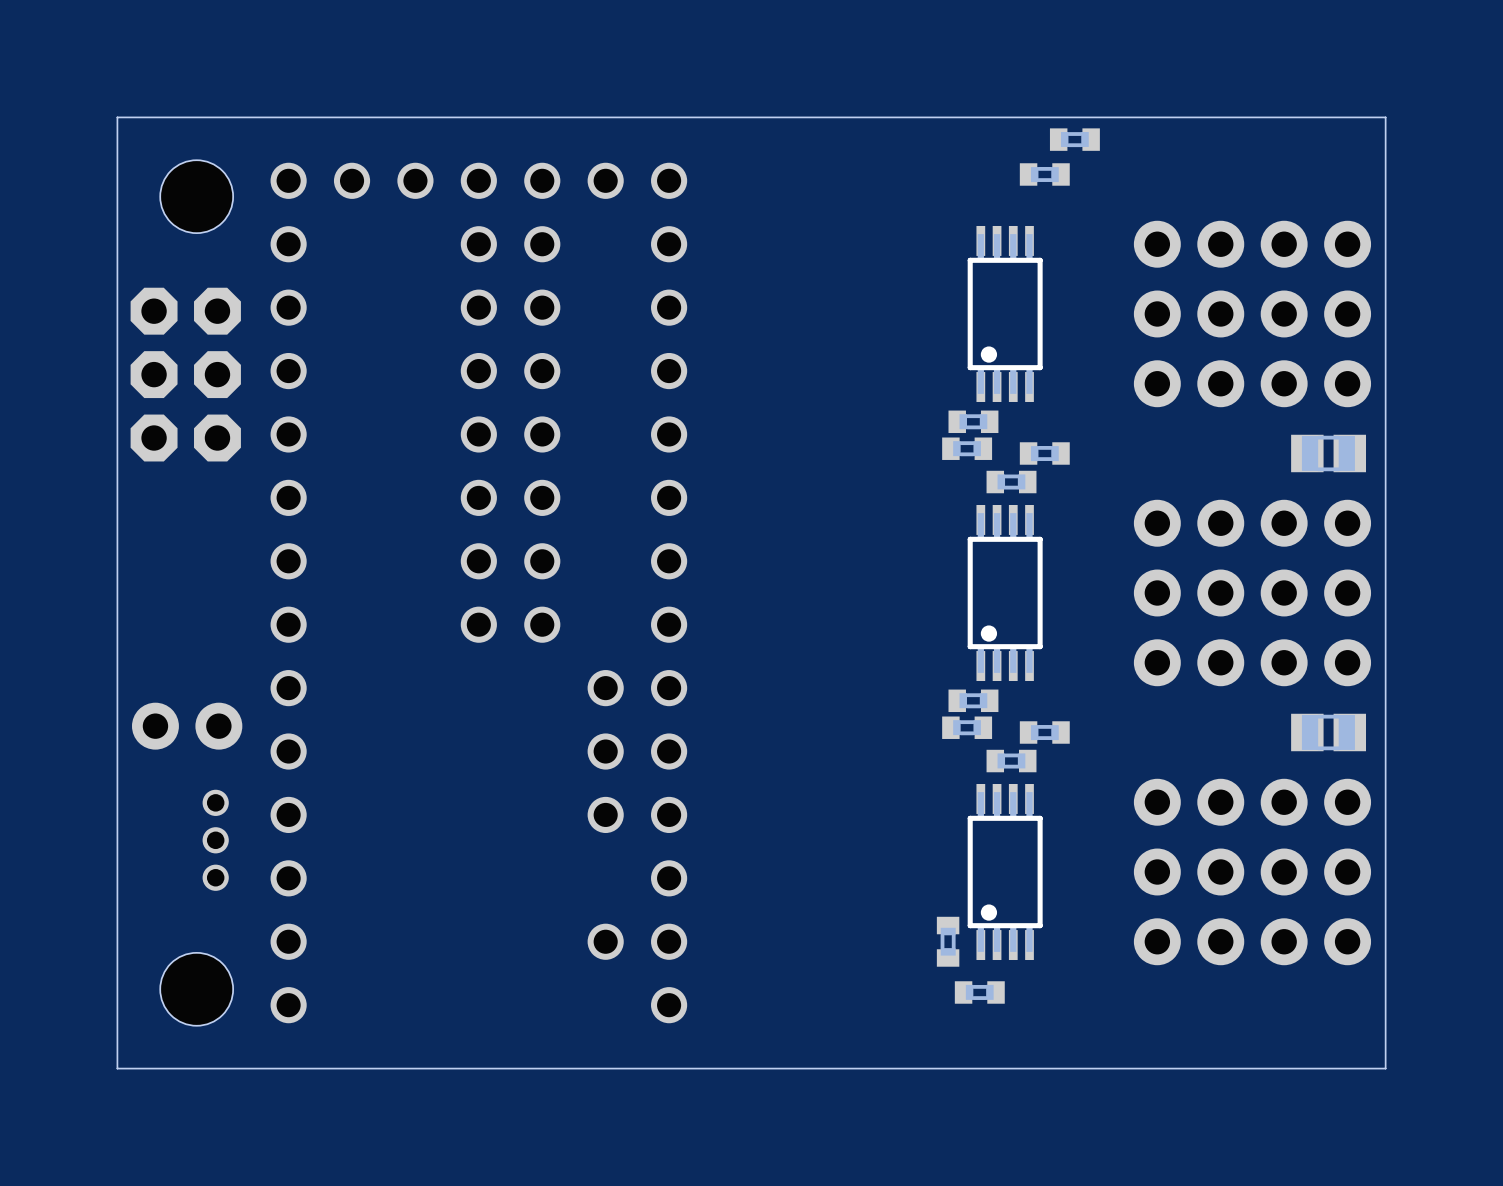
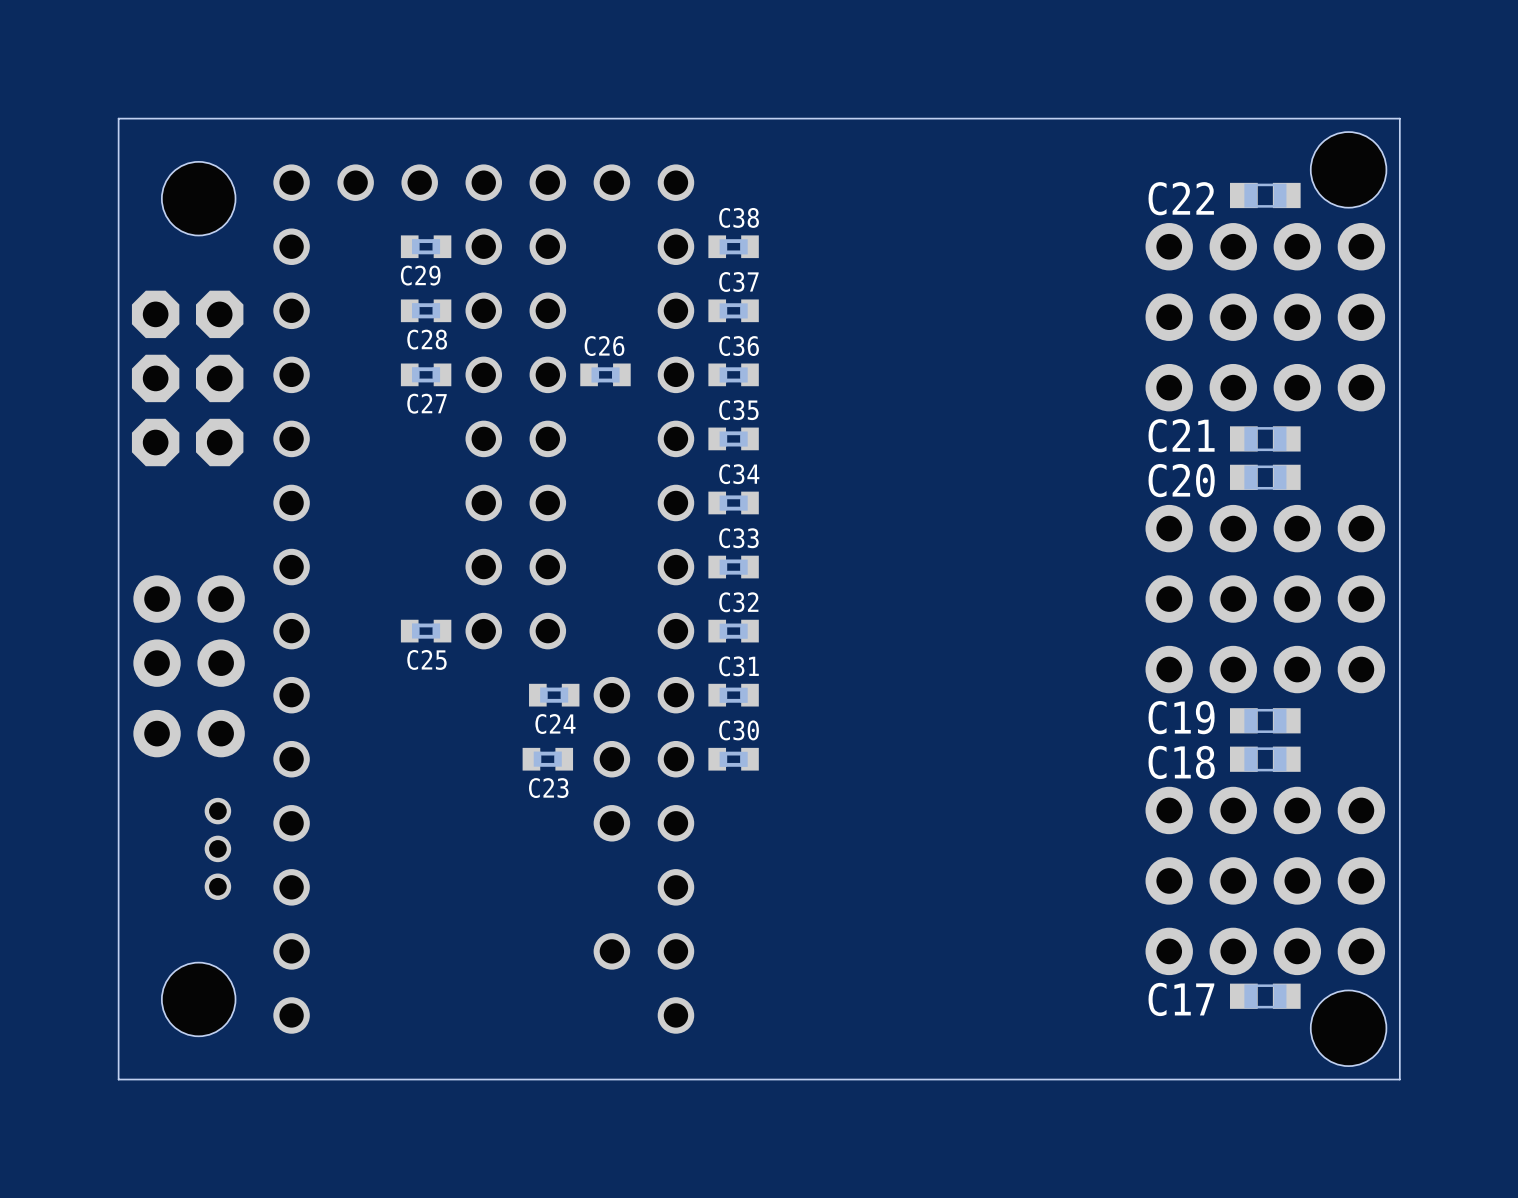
part: (1074, 139) -> none
hole: none -> (1348, 169)
part: (1044, 174) -> none
C22: none -> (1265, 195)
C29: none -> (426, 246)
C38: none -> (733, 246)
C28: none -> (426, 310)
C37: none -> (733, 310)
part: (1005, 313) -> none
C27: none -> (426, 374)
C26: none -> (605, 374)
C36: none -> (733, 374)
part: (973, 421) -> none
C35: none -> (733, 438)
C21: none -> (1265, 438)
part: (967, 448) -> none
part: (1044, 453) -> none
part: (1328, 453) -> none
C20: none -> (1265, 477)
part: (1011, 482) -> none
C34: none -> (733, 502)
C33: none -> (733, 567)
part: none -> (189, 599)
part: (1005, 592) -> none
C25: none -> (426, 631)
C32: none -> (733, 631)
part: none -> (189, 663)
C24: none -> (554, 695)
C31: none -> (733, 695)
part: (973, 700) -> none
C19: none -> (1265, 720)
part: (967, 727) -> none
part: (1044, 732) -> none
part: (1328, 732) -> none
C23: none -> (547, 759)
C30: none -> (733, 759)
C18: none -> (1265, 759)
part: (1011, 761) -> none
part: (1005, 872) -> none
part: (948, 941) -> none
C17: none -> (1265, 996)
part: (979, 992) -> none
hole: none -> (1348, 1028)

